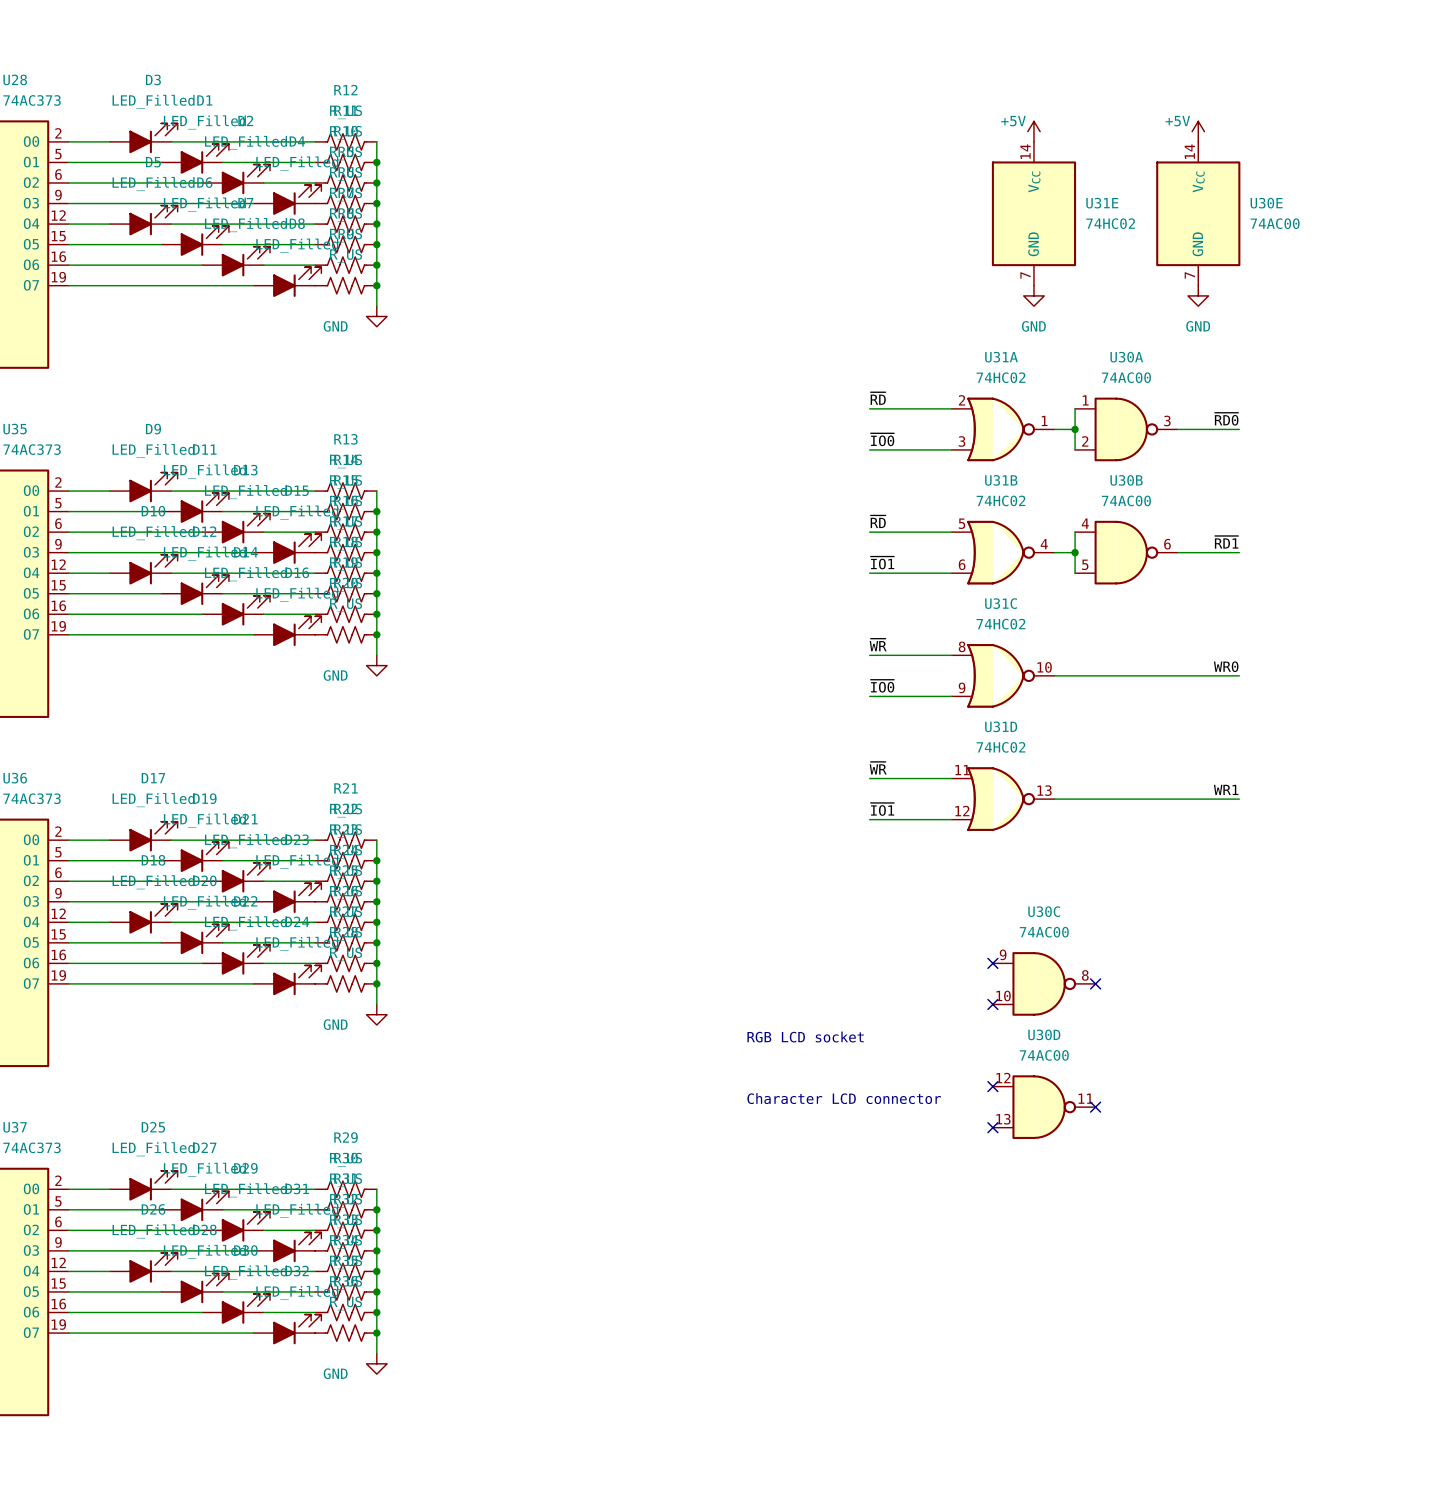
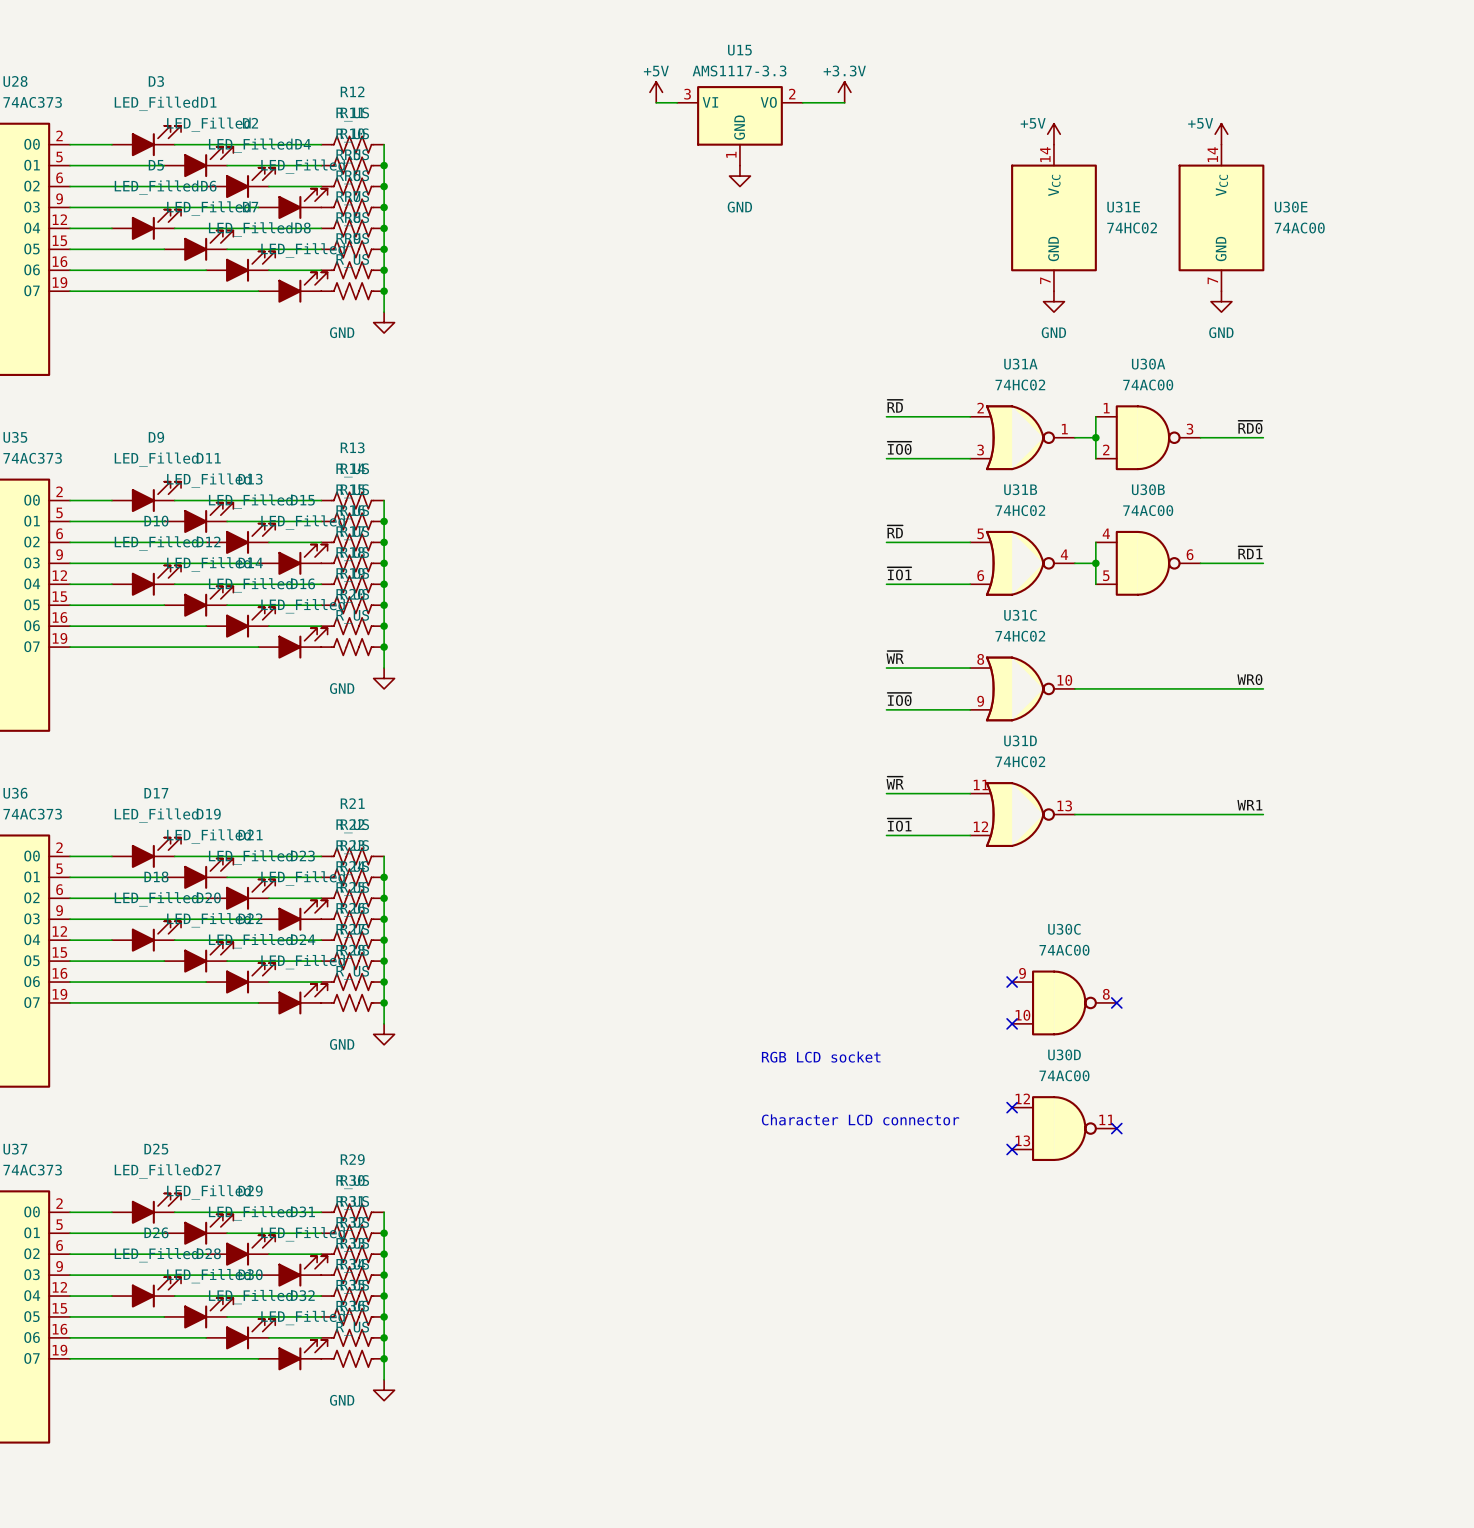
power symbol: none -> +5V (656, 92)
power symbol: none -> +3.3V (844, 92)
wire: none -> (656, 102) (677, 102)
wire: none -> (802, 102) (844, 102)
U15: none -> AMS1117-3.3 (739, 125)
power symbol: none -> GND (739, 176)

